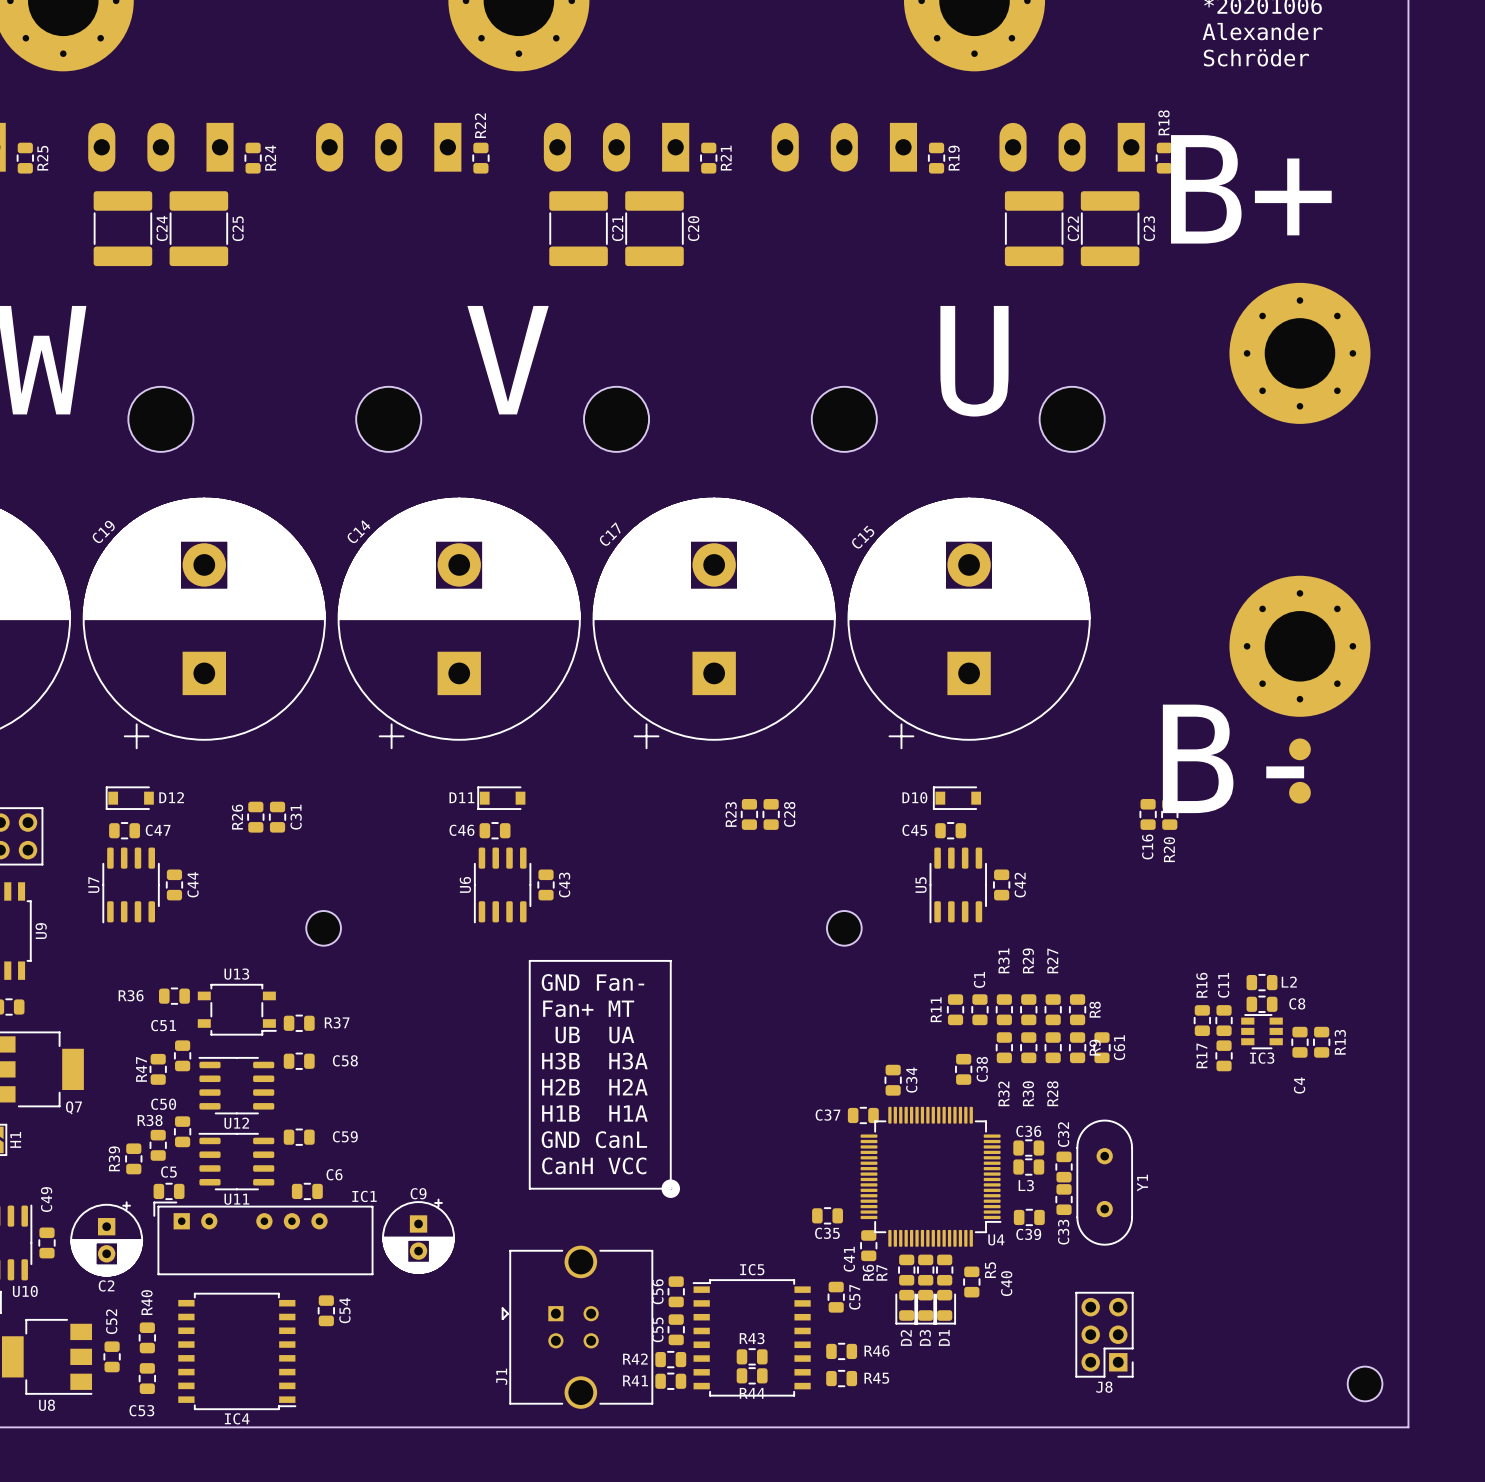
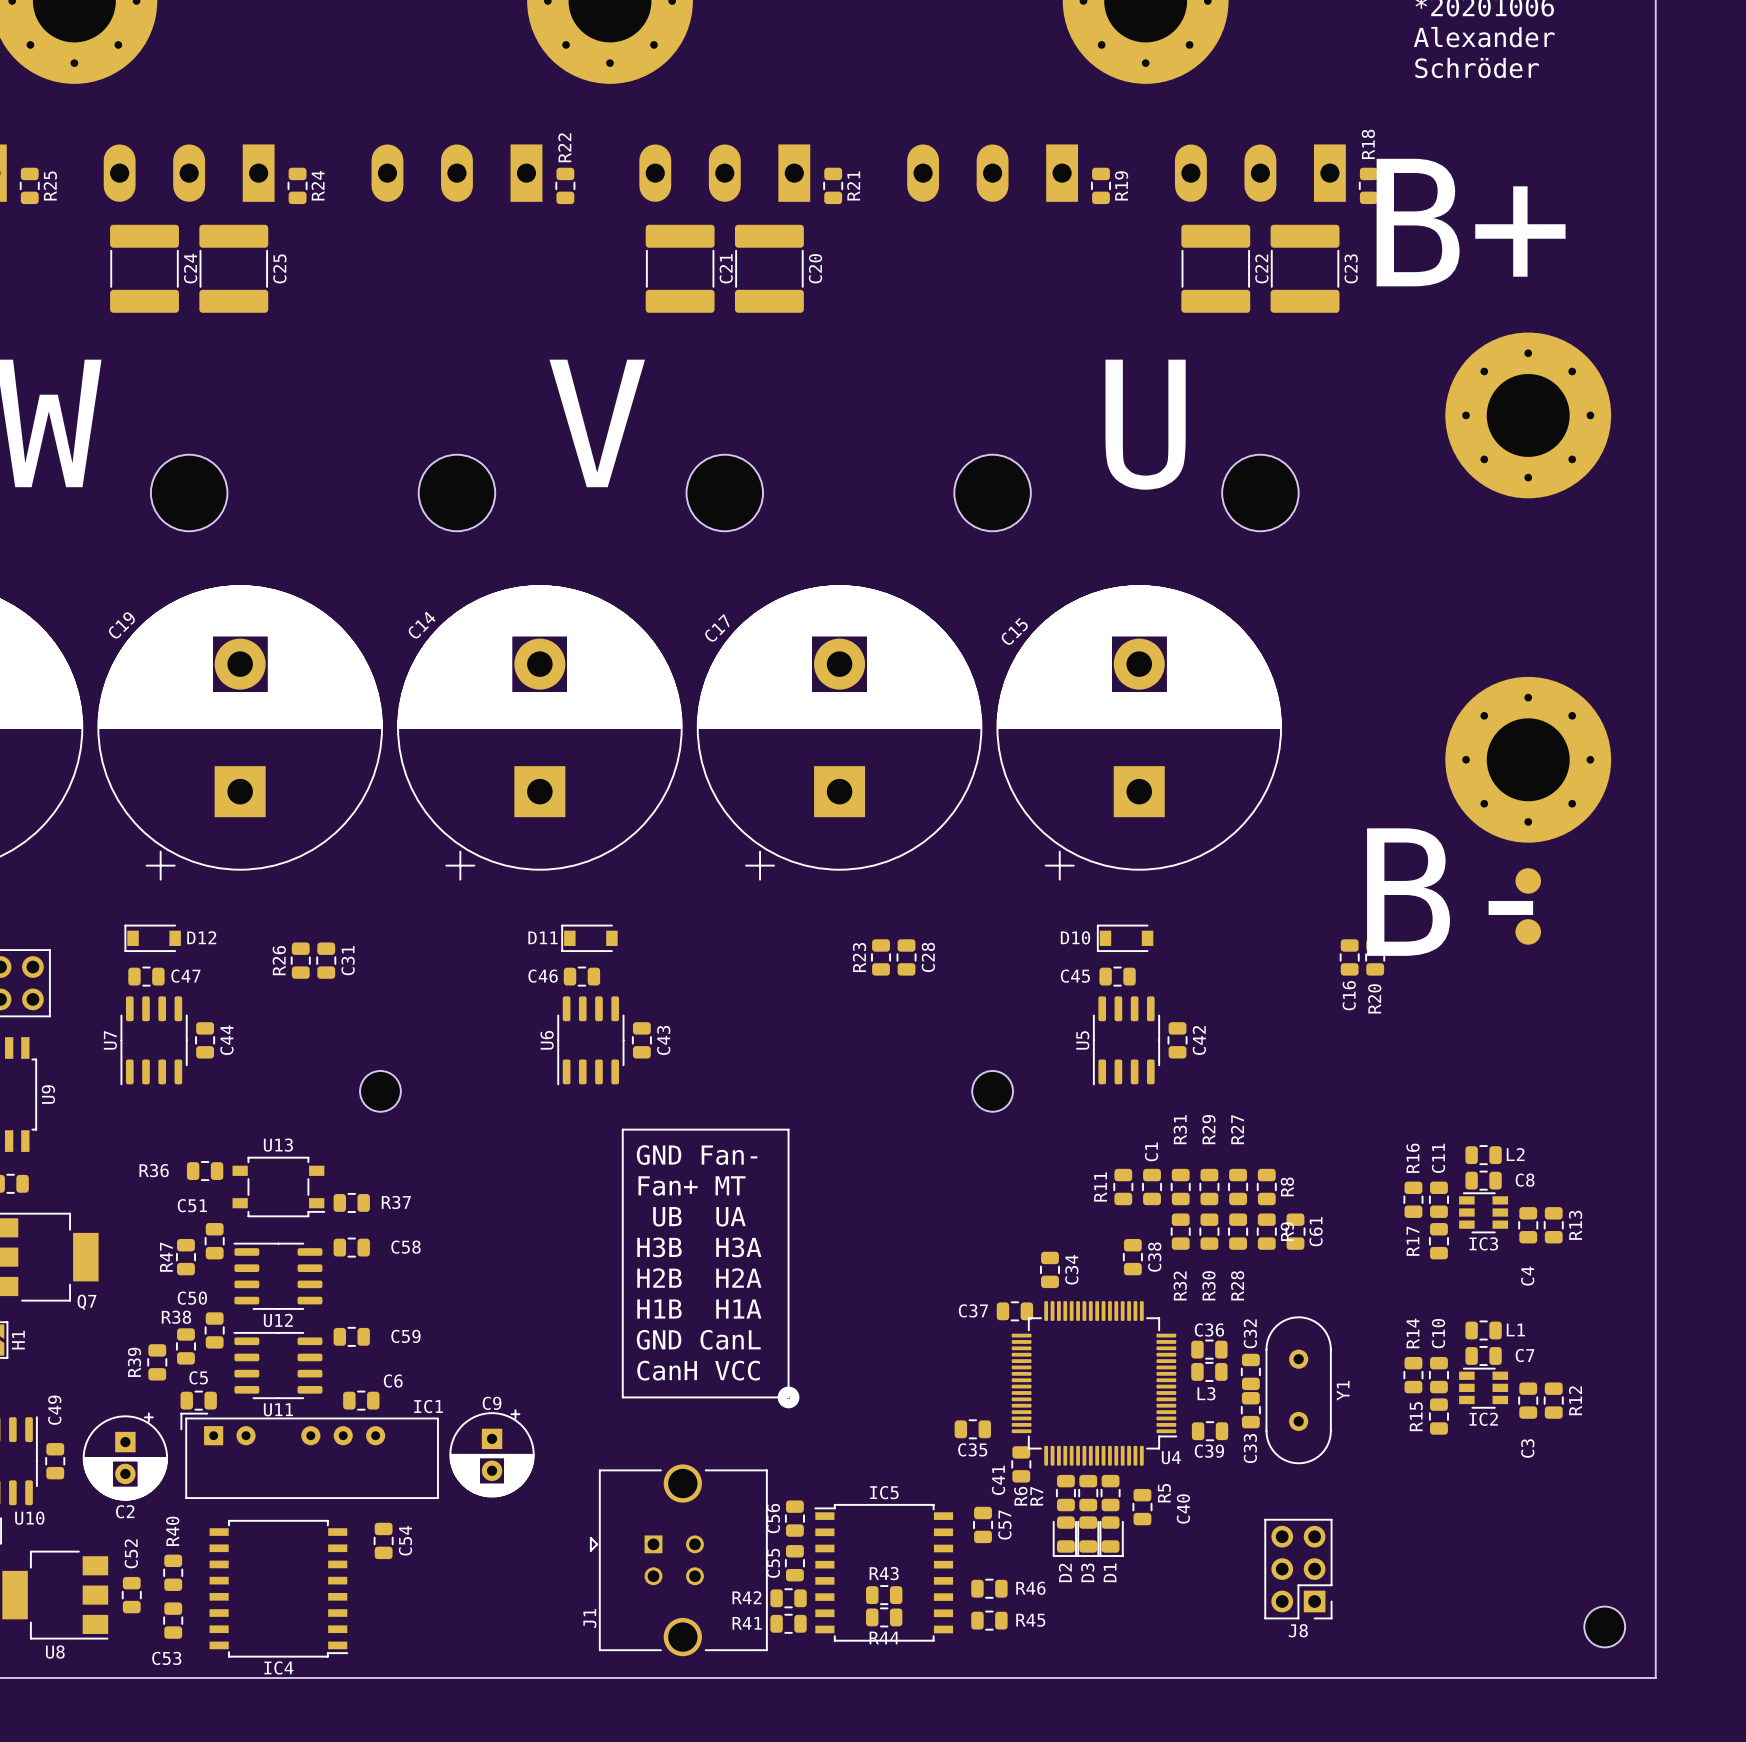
L1: none -> (1483, 1330)
C7: none -> (1483, 1355)
R14: none -> (1413, 1375)
C10: none -> (1438, 1375)
IC2: none -> (1483, 1388)
C3: none -> (1528, 1400)
R12: none -> (1553, 1400)
R15: none -> (1438, 1416)

